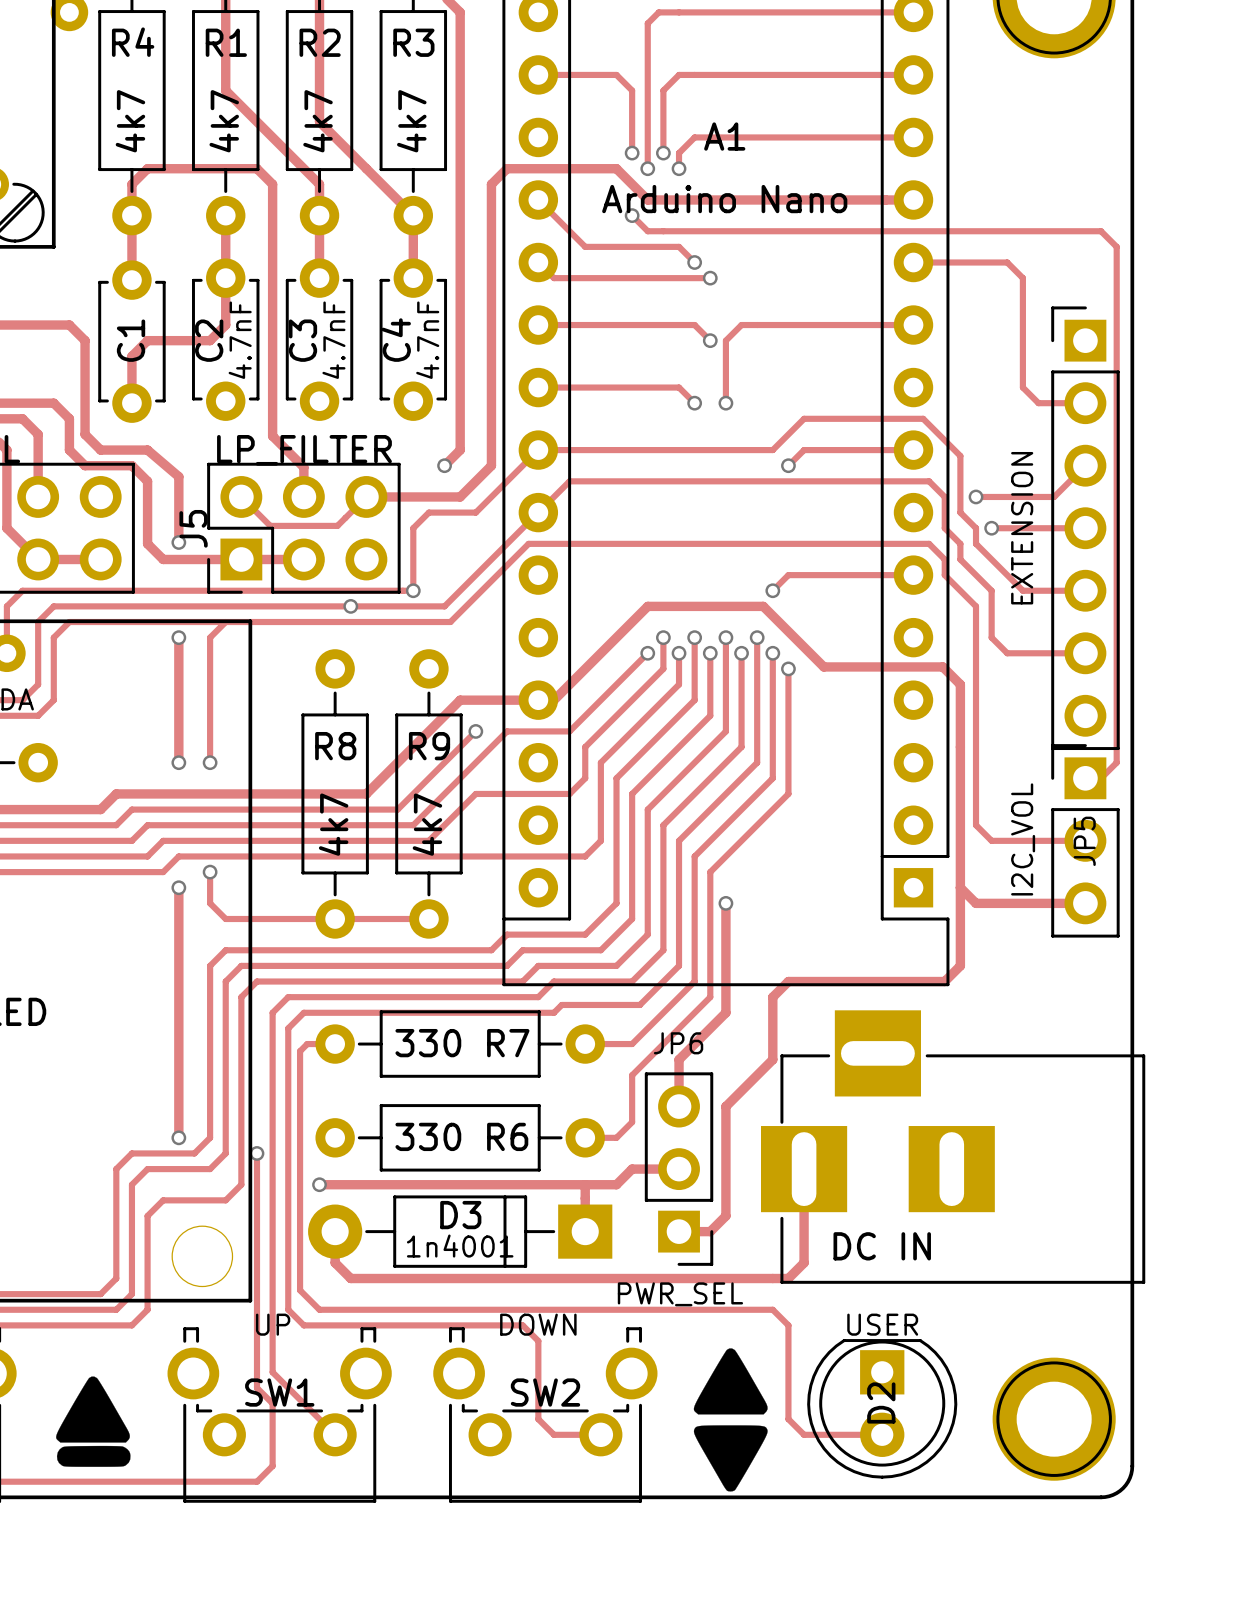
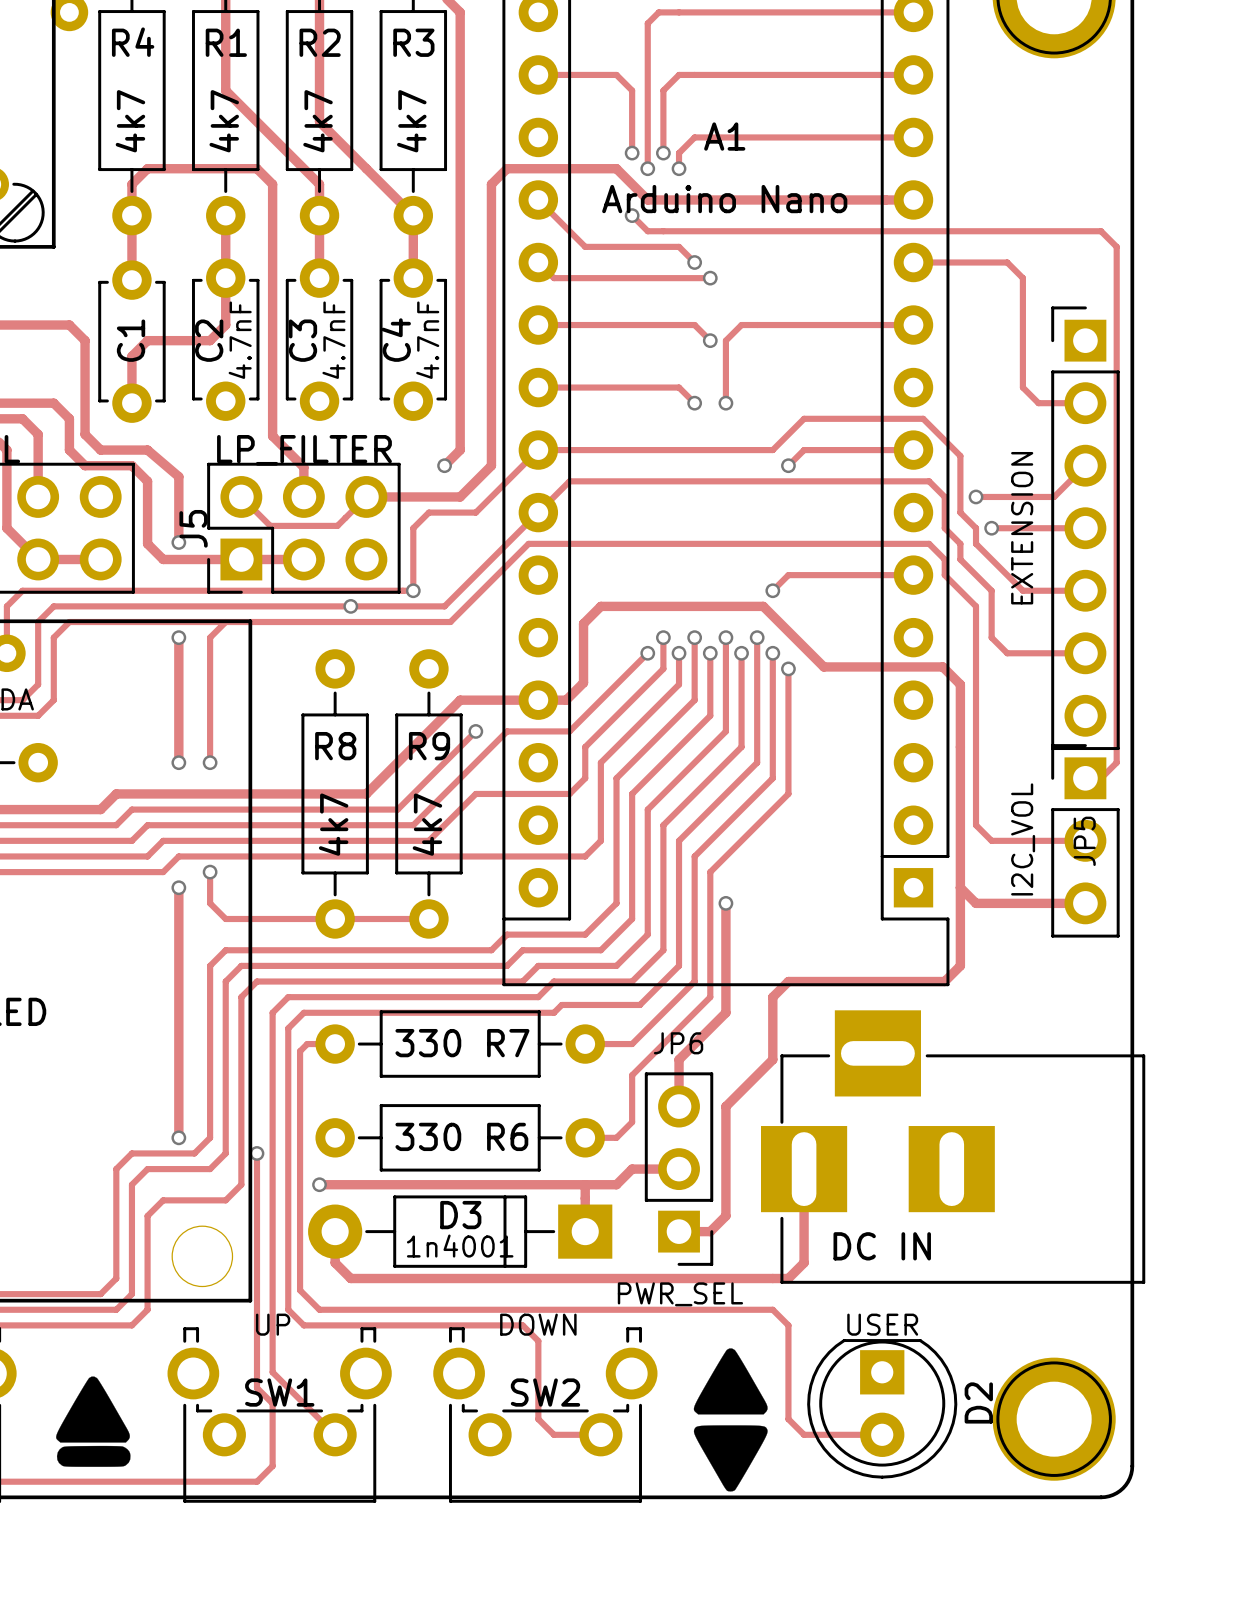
track: (647, 606) (553, 700) -> (647, 606) (600, 606) (583, 623) (583, 682) (566, 700) (553, 700)
D2 name position: D2 (881, 1402) -> D2 (978, 1402)

